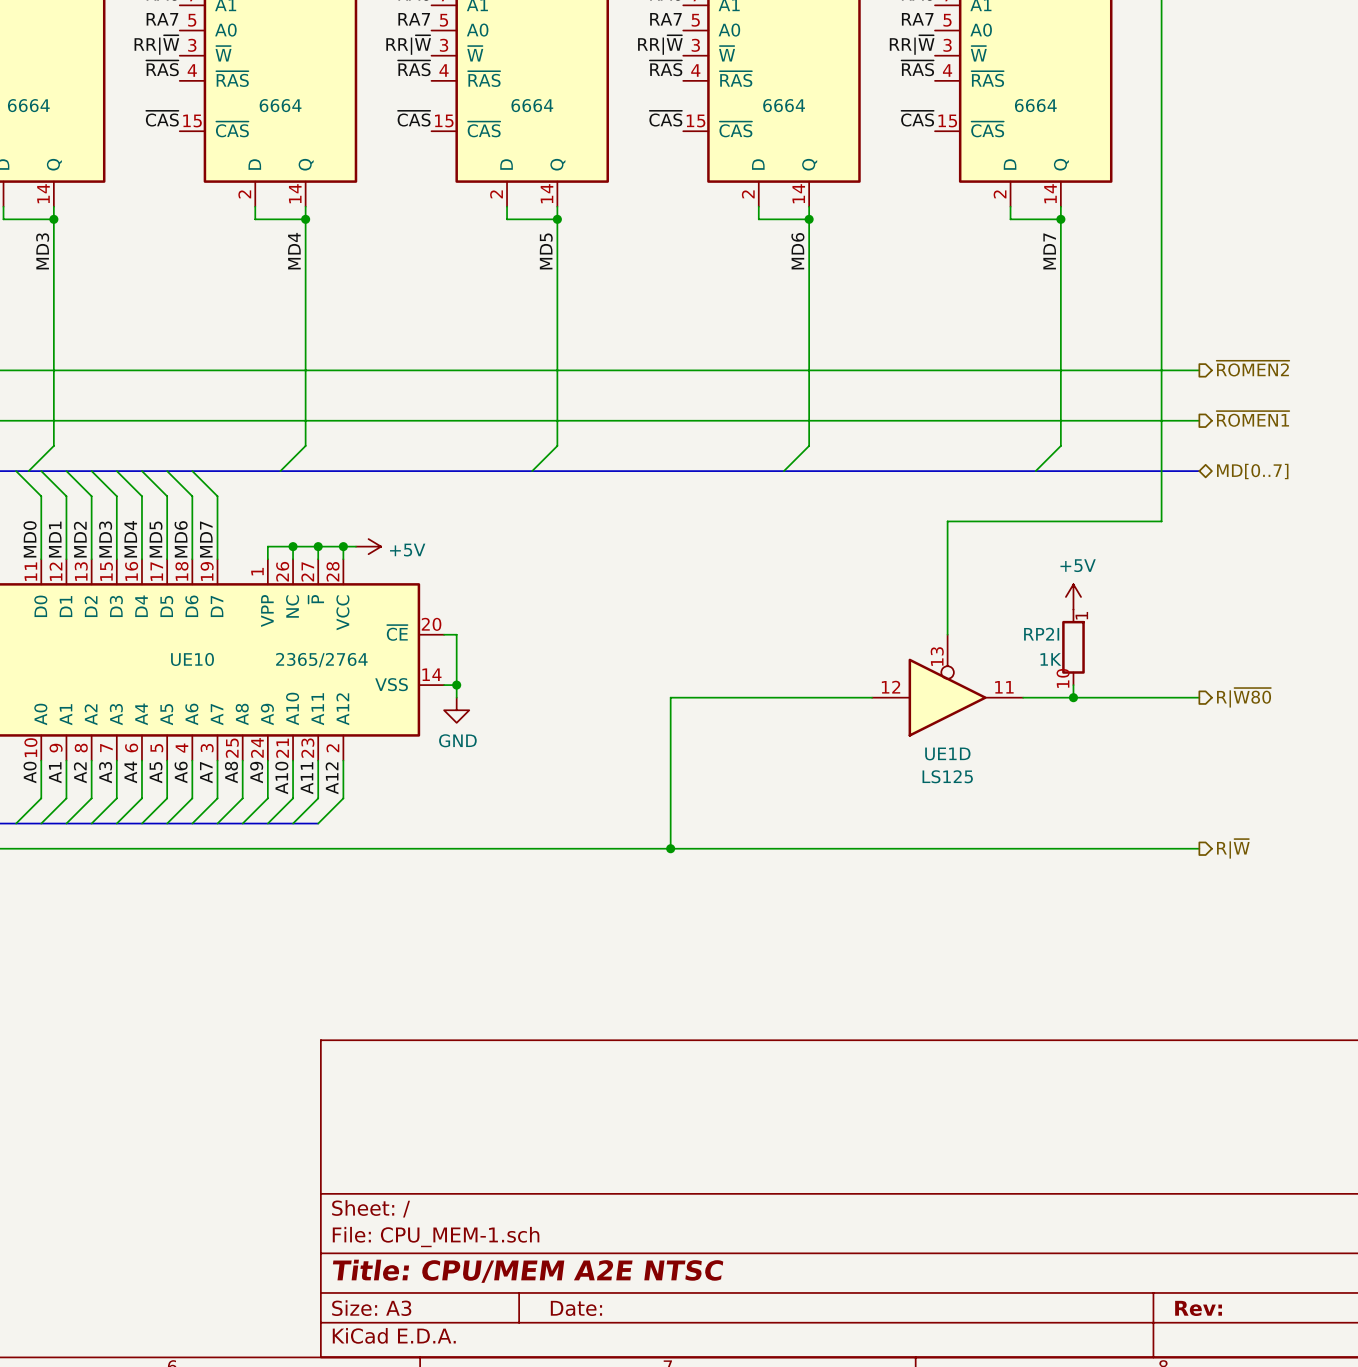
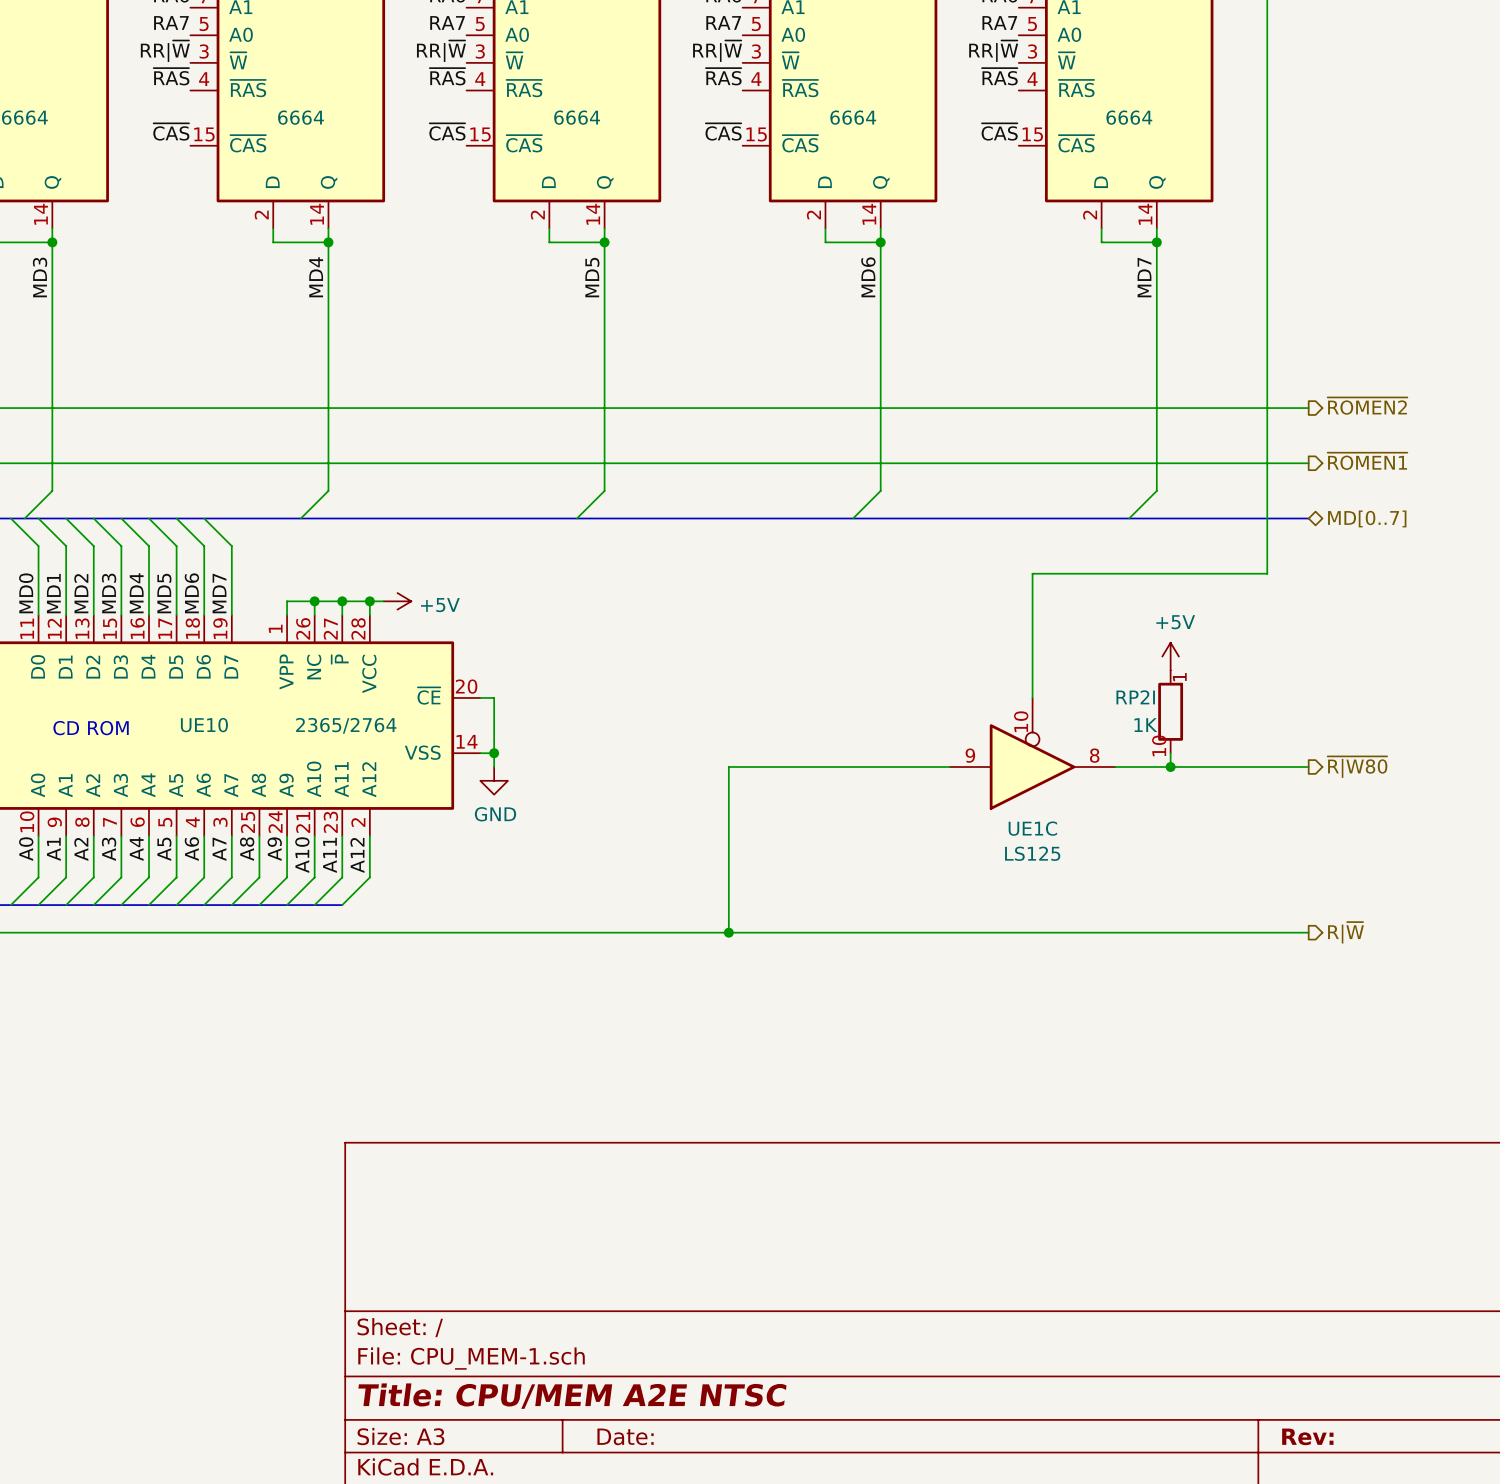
UE1D pin number: 13 (937, 656) -> 10 (1021, 721)
text: none -> CD ROM (91, 728)
UE1D pin number: 12 (891, 687) -> 9 (970, 755)
UE1D pin number: 11 (1004, 687) -> 8 (1094, 755)
hierarchical label: R|~{W80} (1244, 697) -> ~{R|W80} (1357, 767)
UE1D name: UE1D (947, 753) -> UE1C (1032, 828)

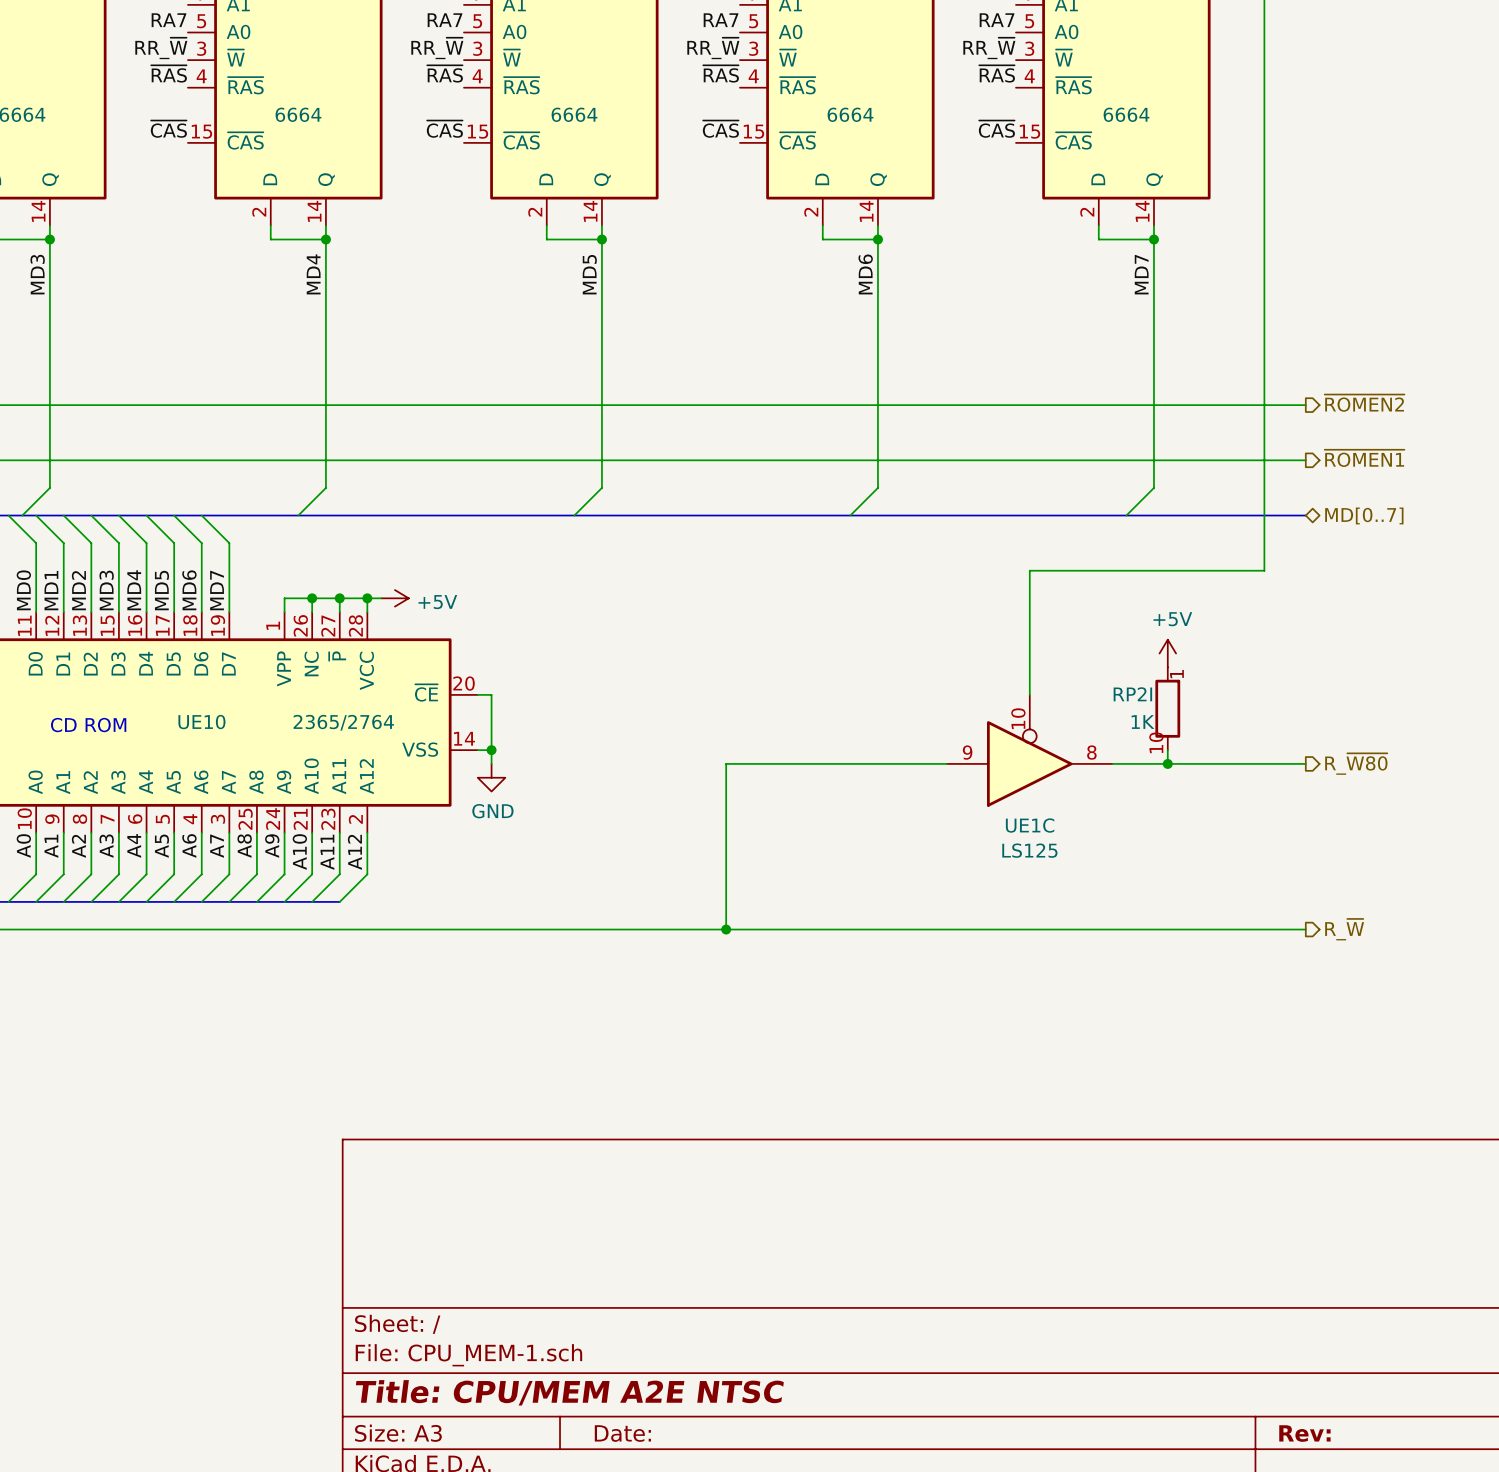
label: RR|~{W} (165, 51) -> RR_~{W} (161, 48)
label: RR|~{W} (441, 51) -> RR_~{W} (437, 48)
label: RR|~{W} (717, 51) -> RR_~{W} (713, 48)
label: RR|~{W} (993, 51) -> RR_~{W} (989, 48)
hierarchical label: ~{R|W80} (1357, 767) -> R_~{W80} (1356, 764)
hierarchical label: R|~{W} (1345, 932) -> R_~{W} (1344, 929)

